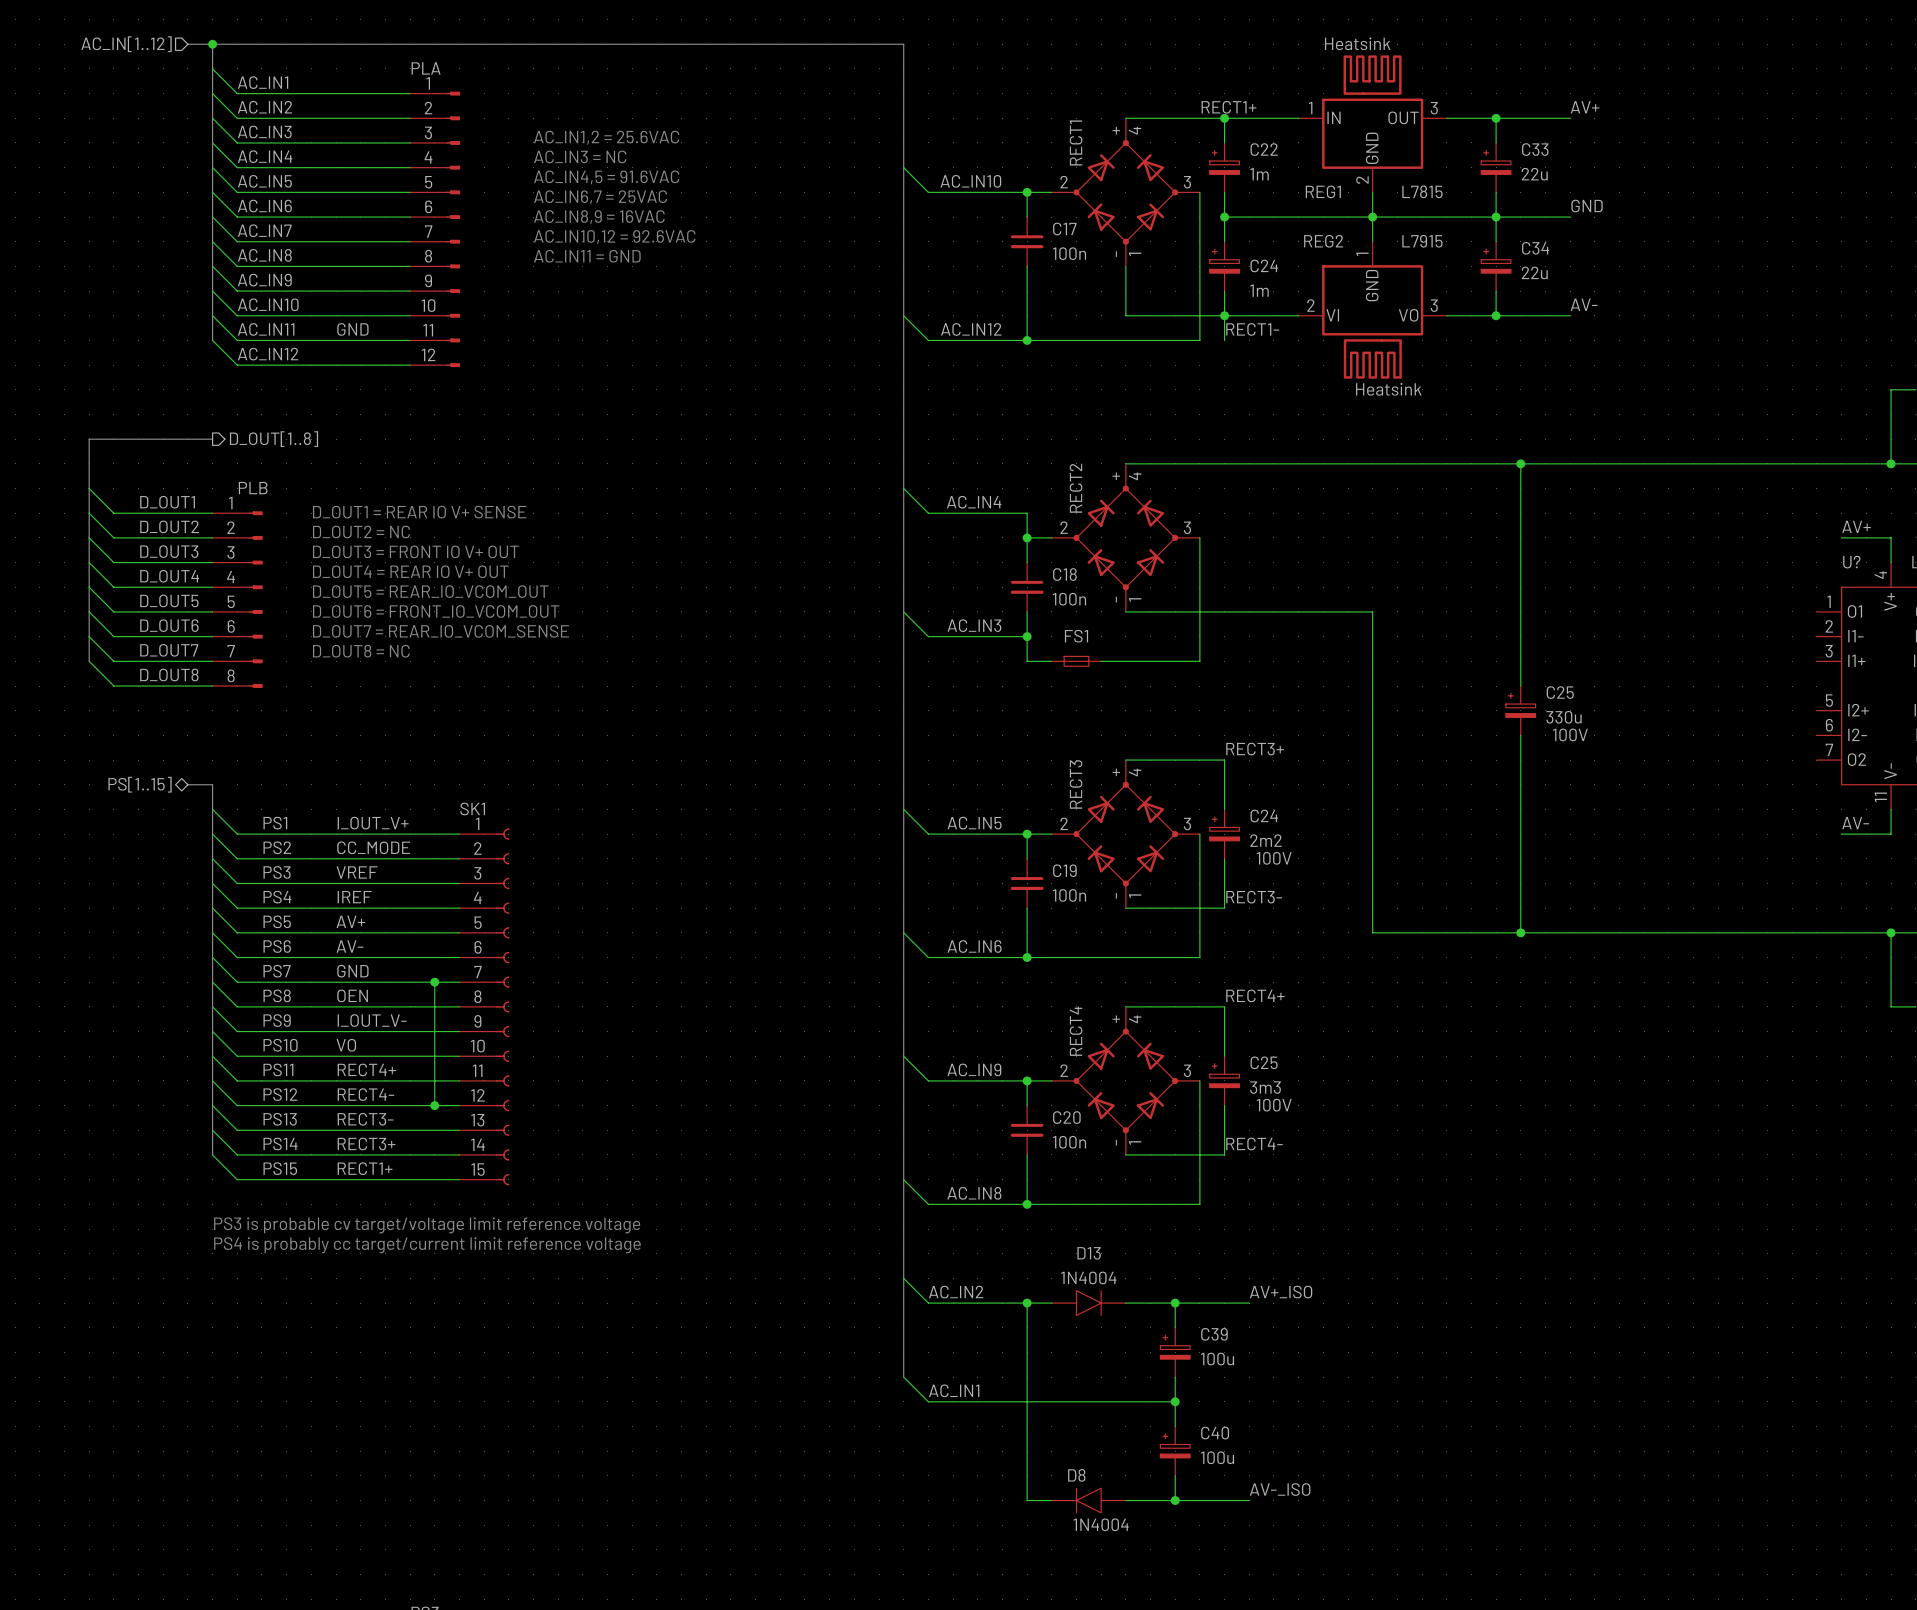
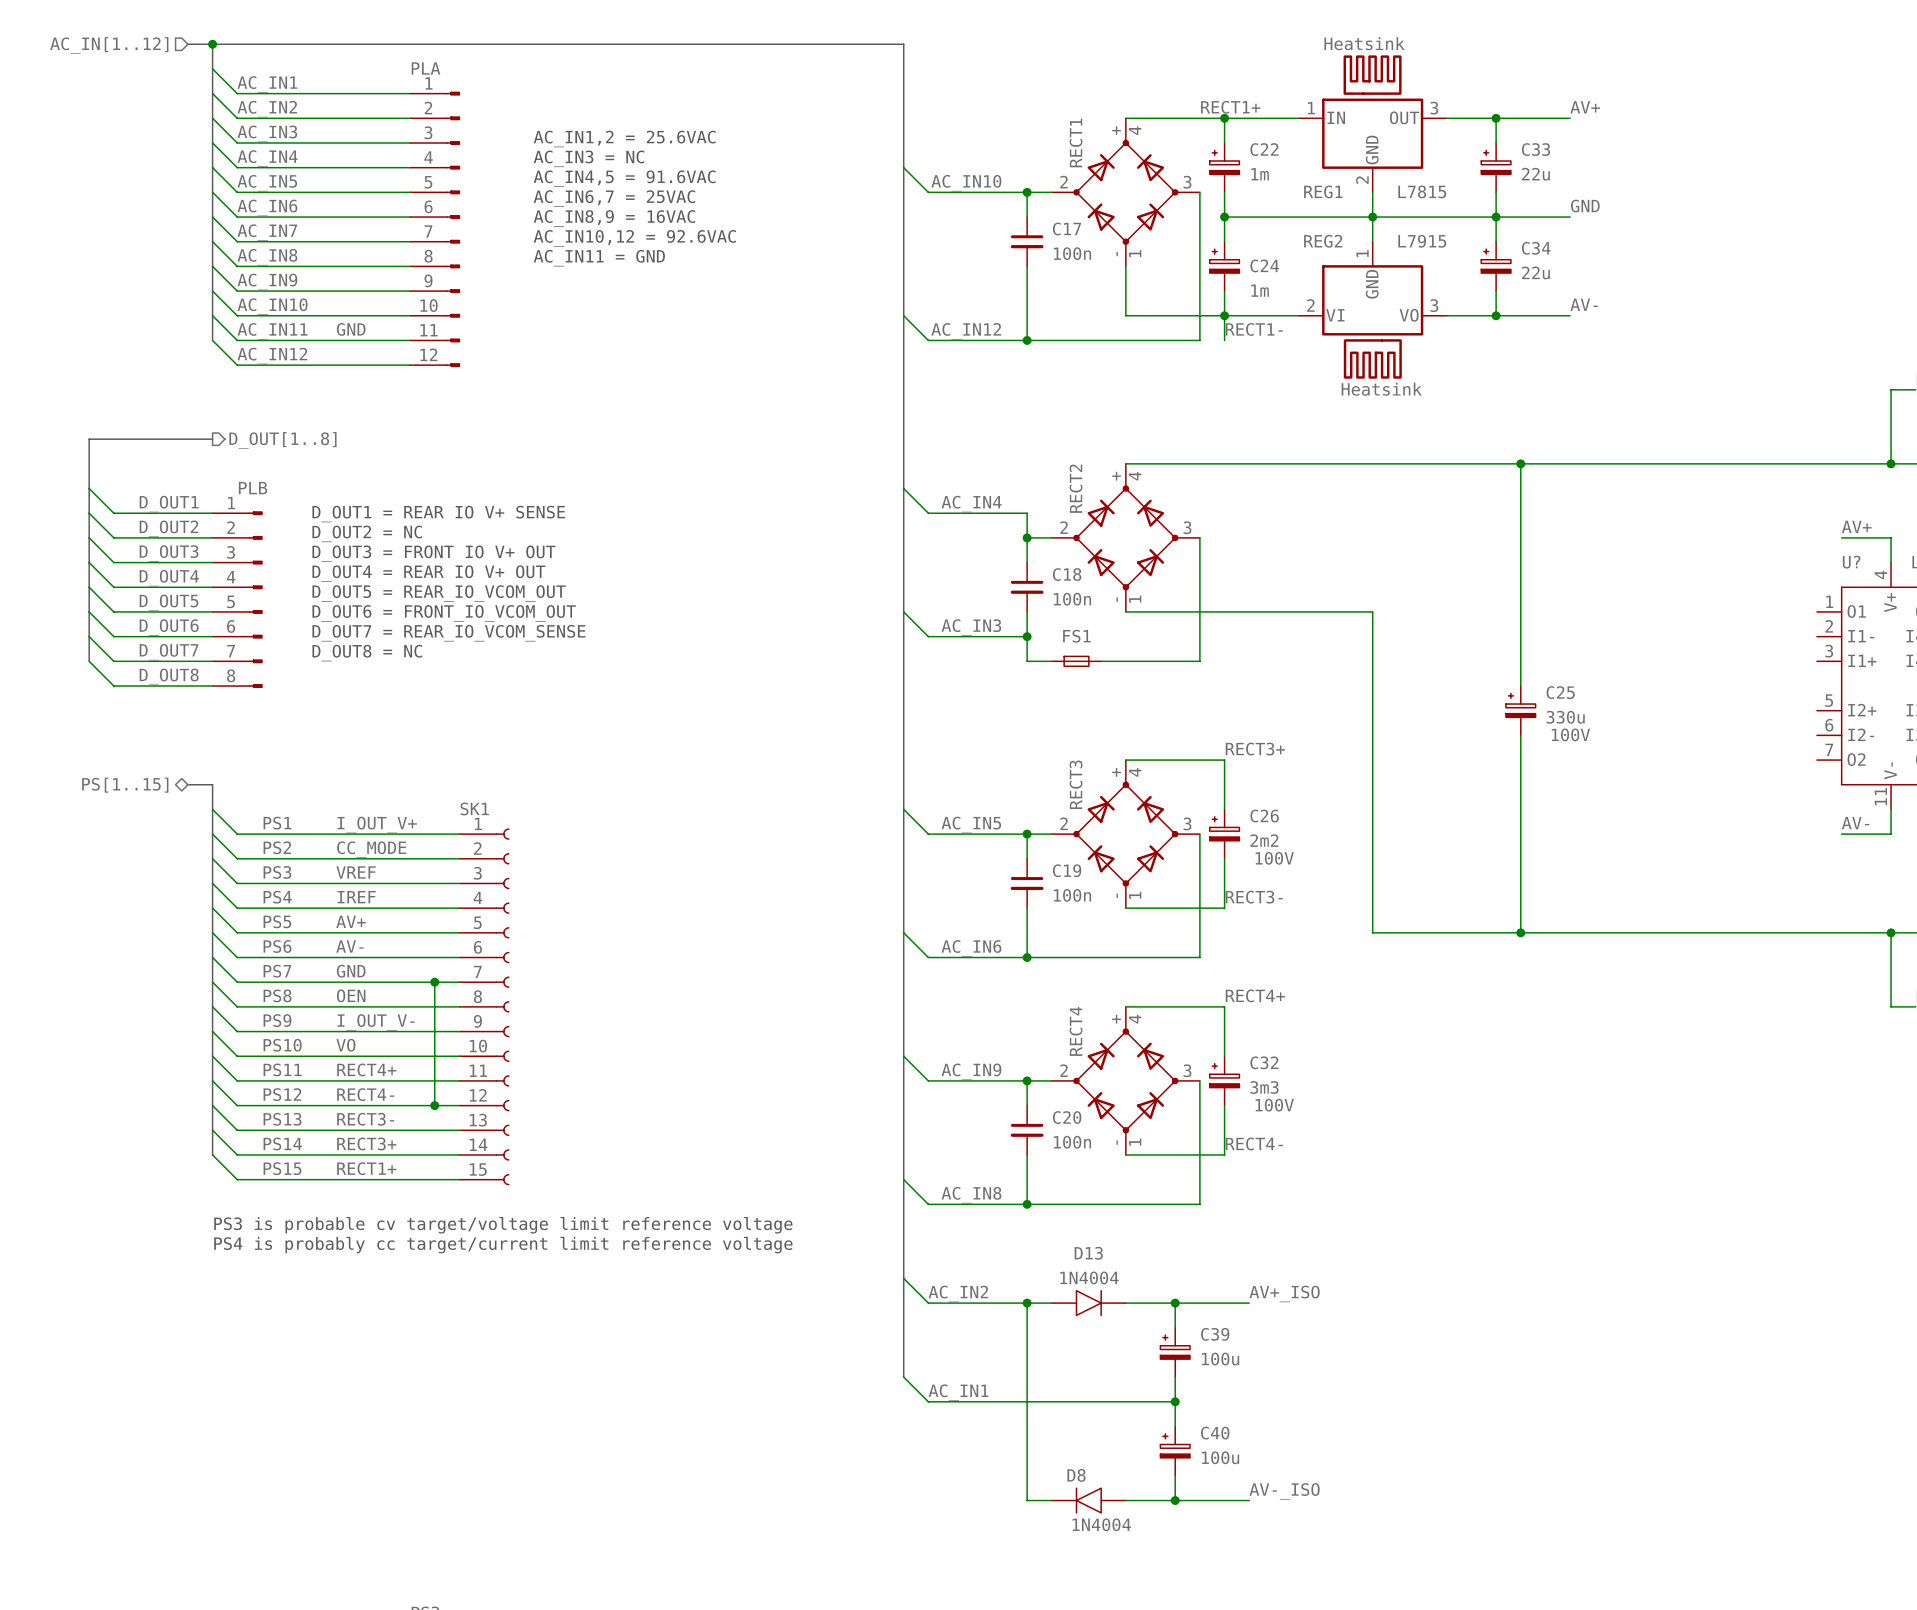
C24 name: C24 (1264, 816) -> C26 (1264, 816)
C25 name: C25 (1264, 1062) -> C32 (1264, 1062)

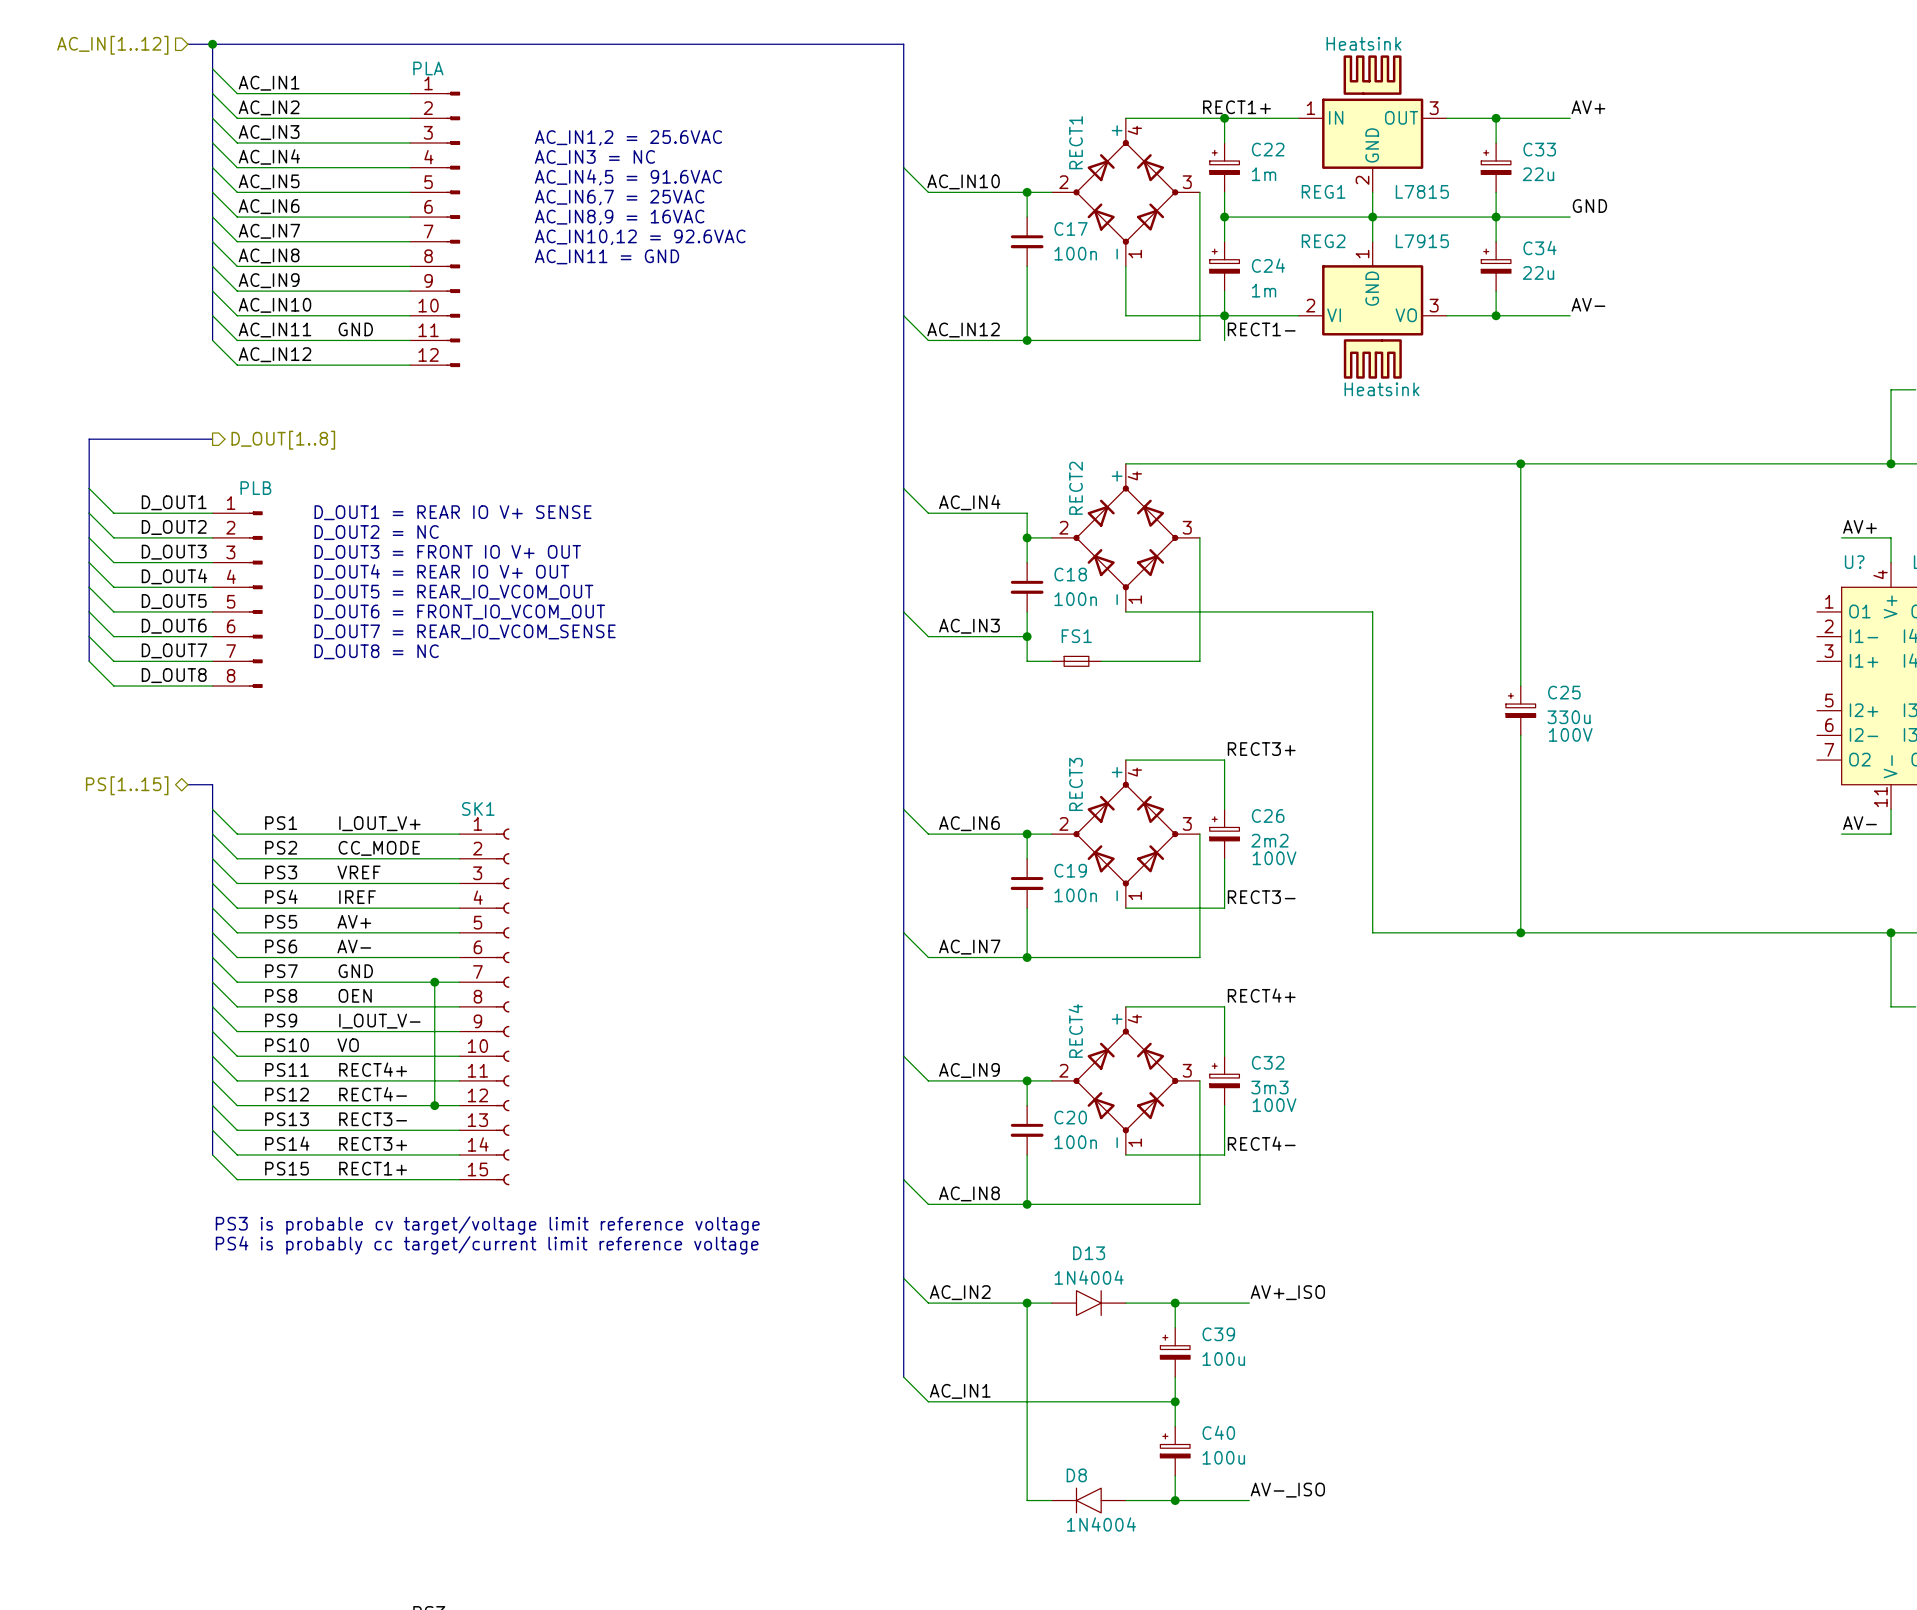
label: AC_IN5 (971, 824) -> AC_IN6 (969, 823)
label: AC_IN6 (971, 948) -> AC_IN7 (969, 947)

